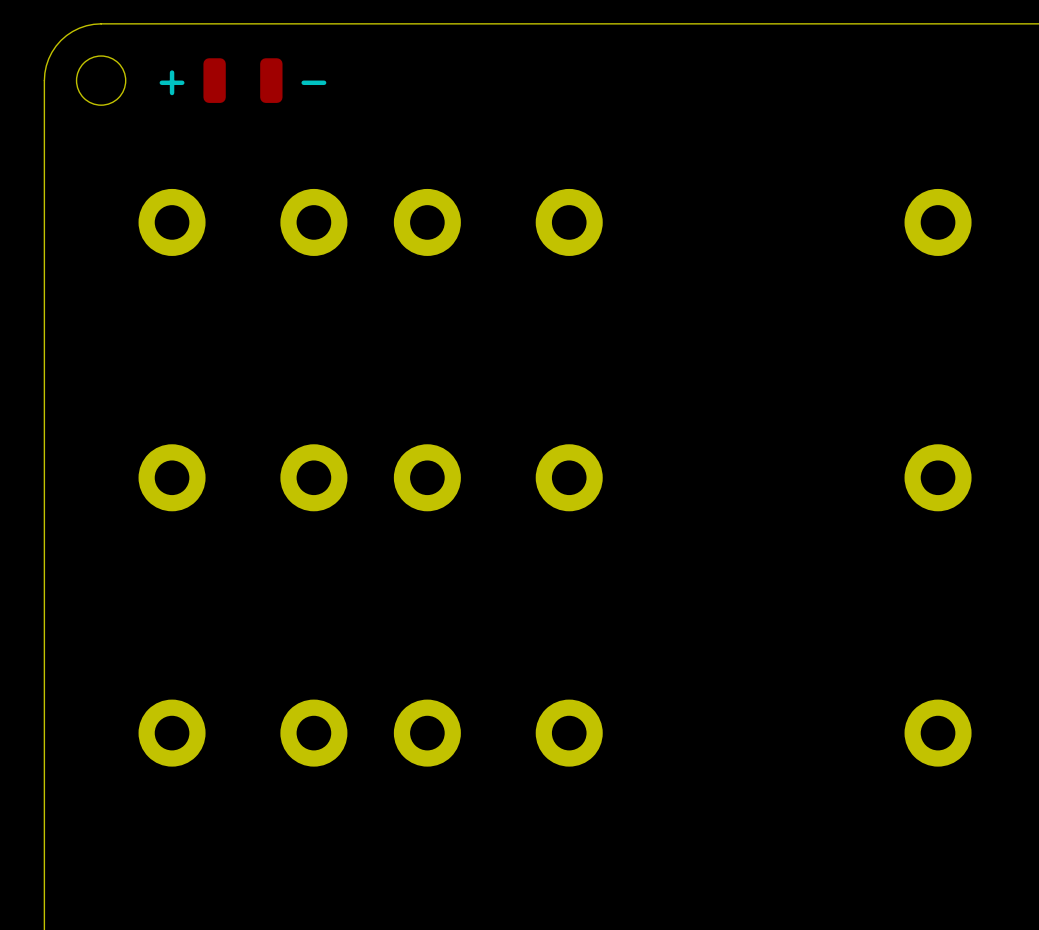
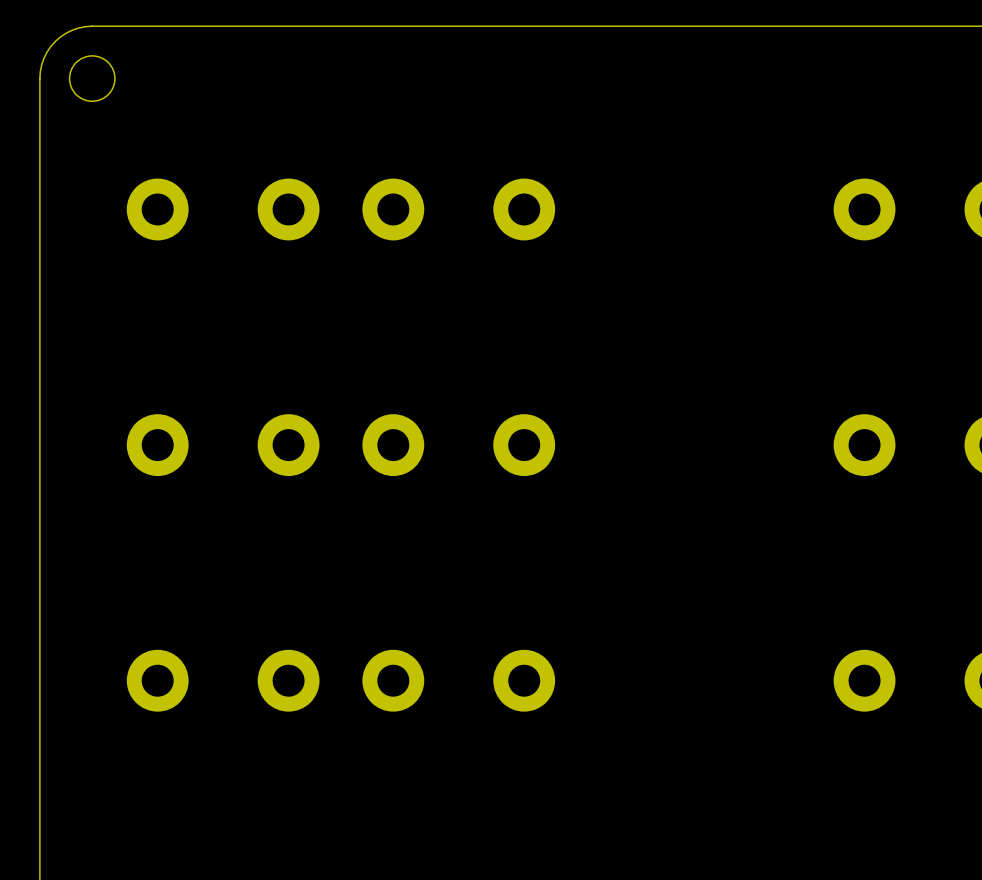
part: (214, 80) -> none
part: (271, 80) -> none
text: + (172, 82) -> none
text: - (313, 82) -> none

